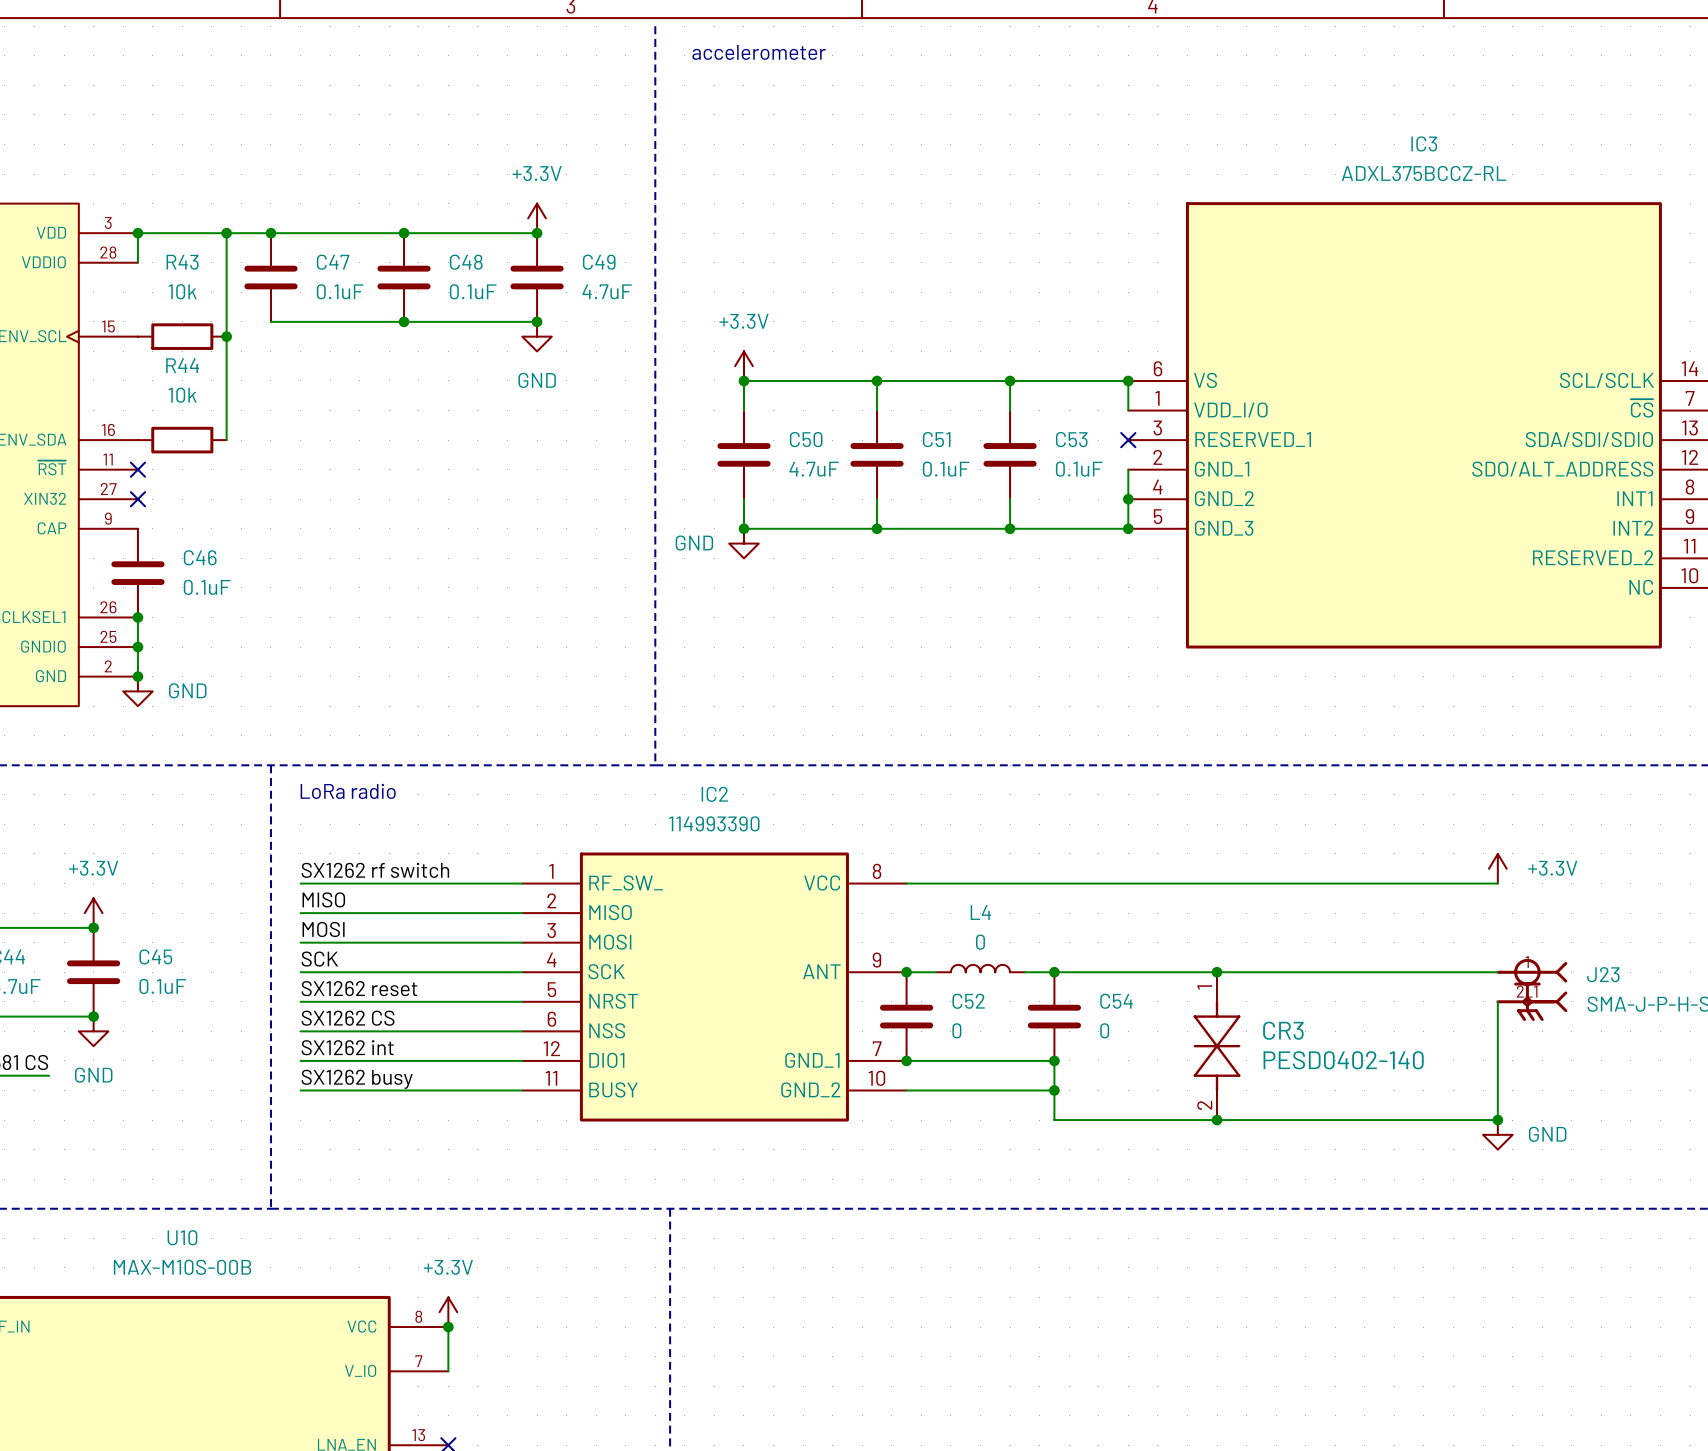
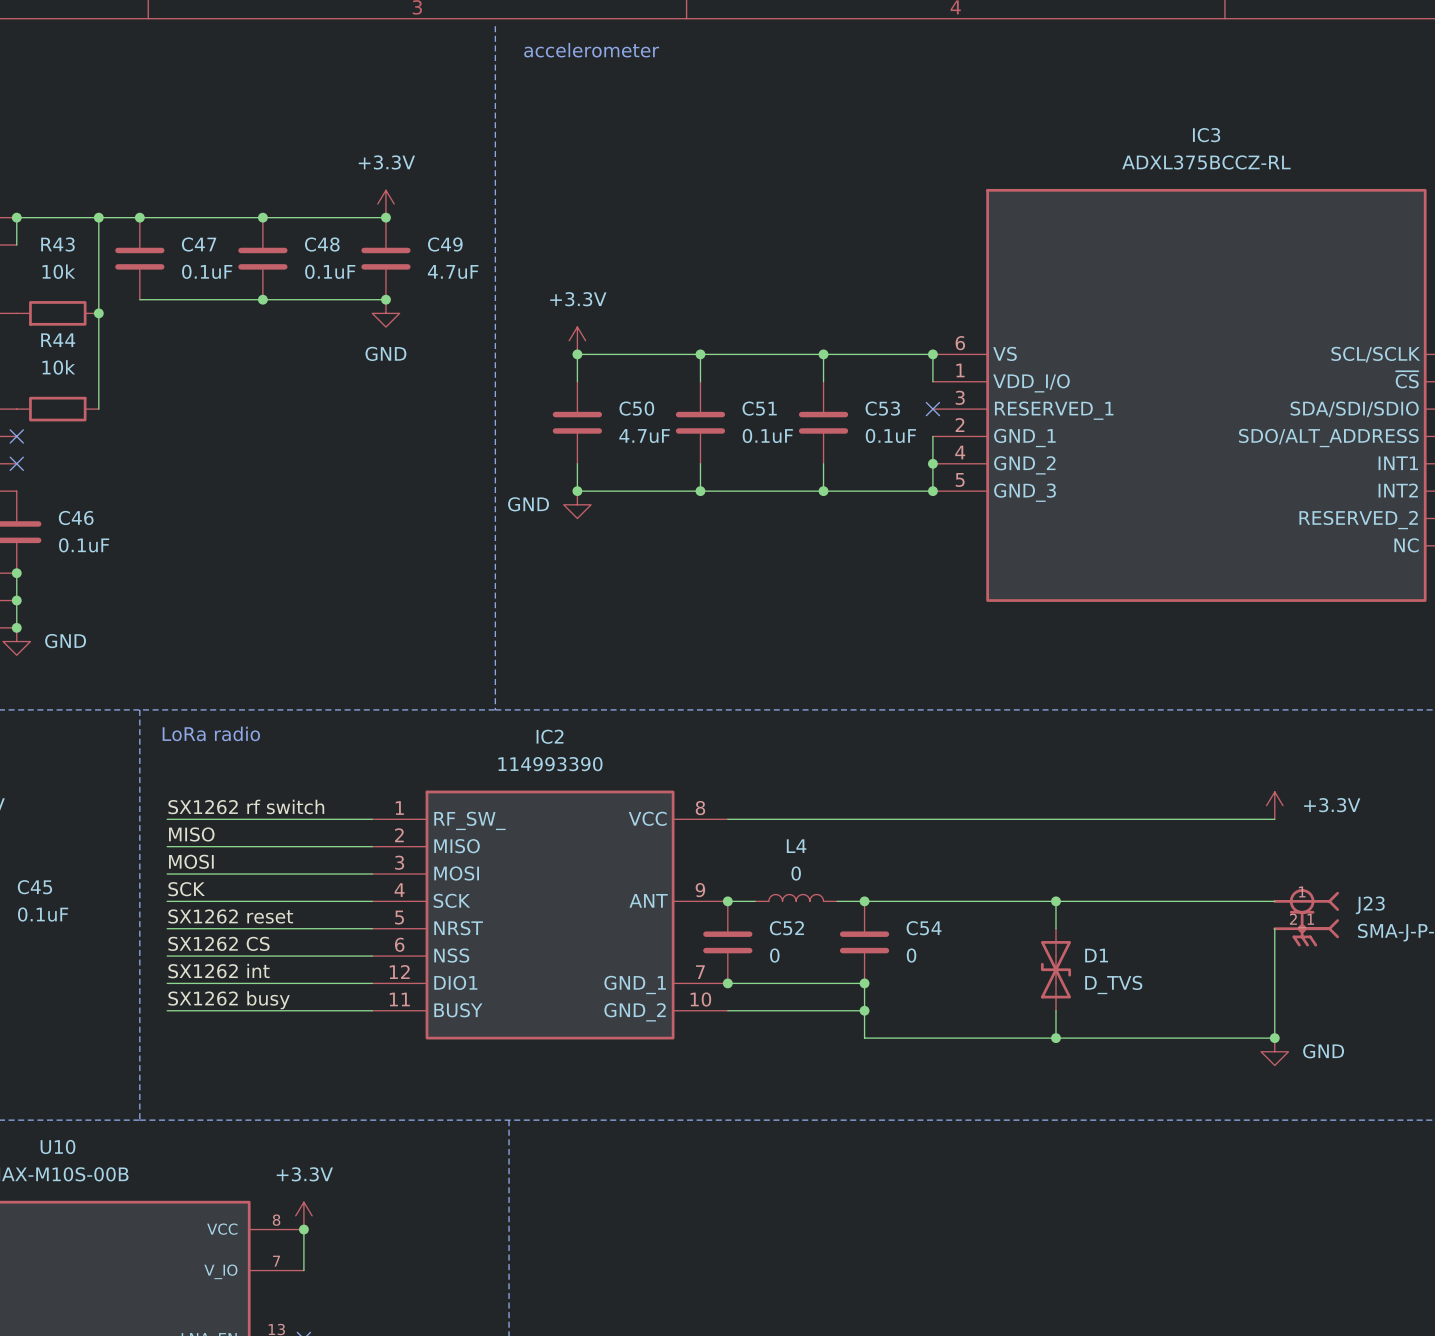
junction position: (1217, 972) -> (1055, 901)
wire: none -> (1055, 901) (1055, 928)
CR3: PESD0402-140 (1217, 1046) -> none
D1: none -> D_TVS (1055, 969)
wire: none -> (1055, 1010) (1055, 1038)
junction position: (1217, 1120) -> (1055, 1038)

